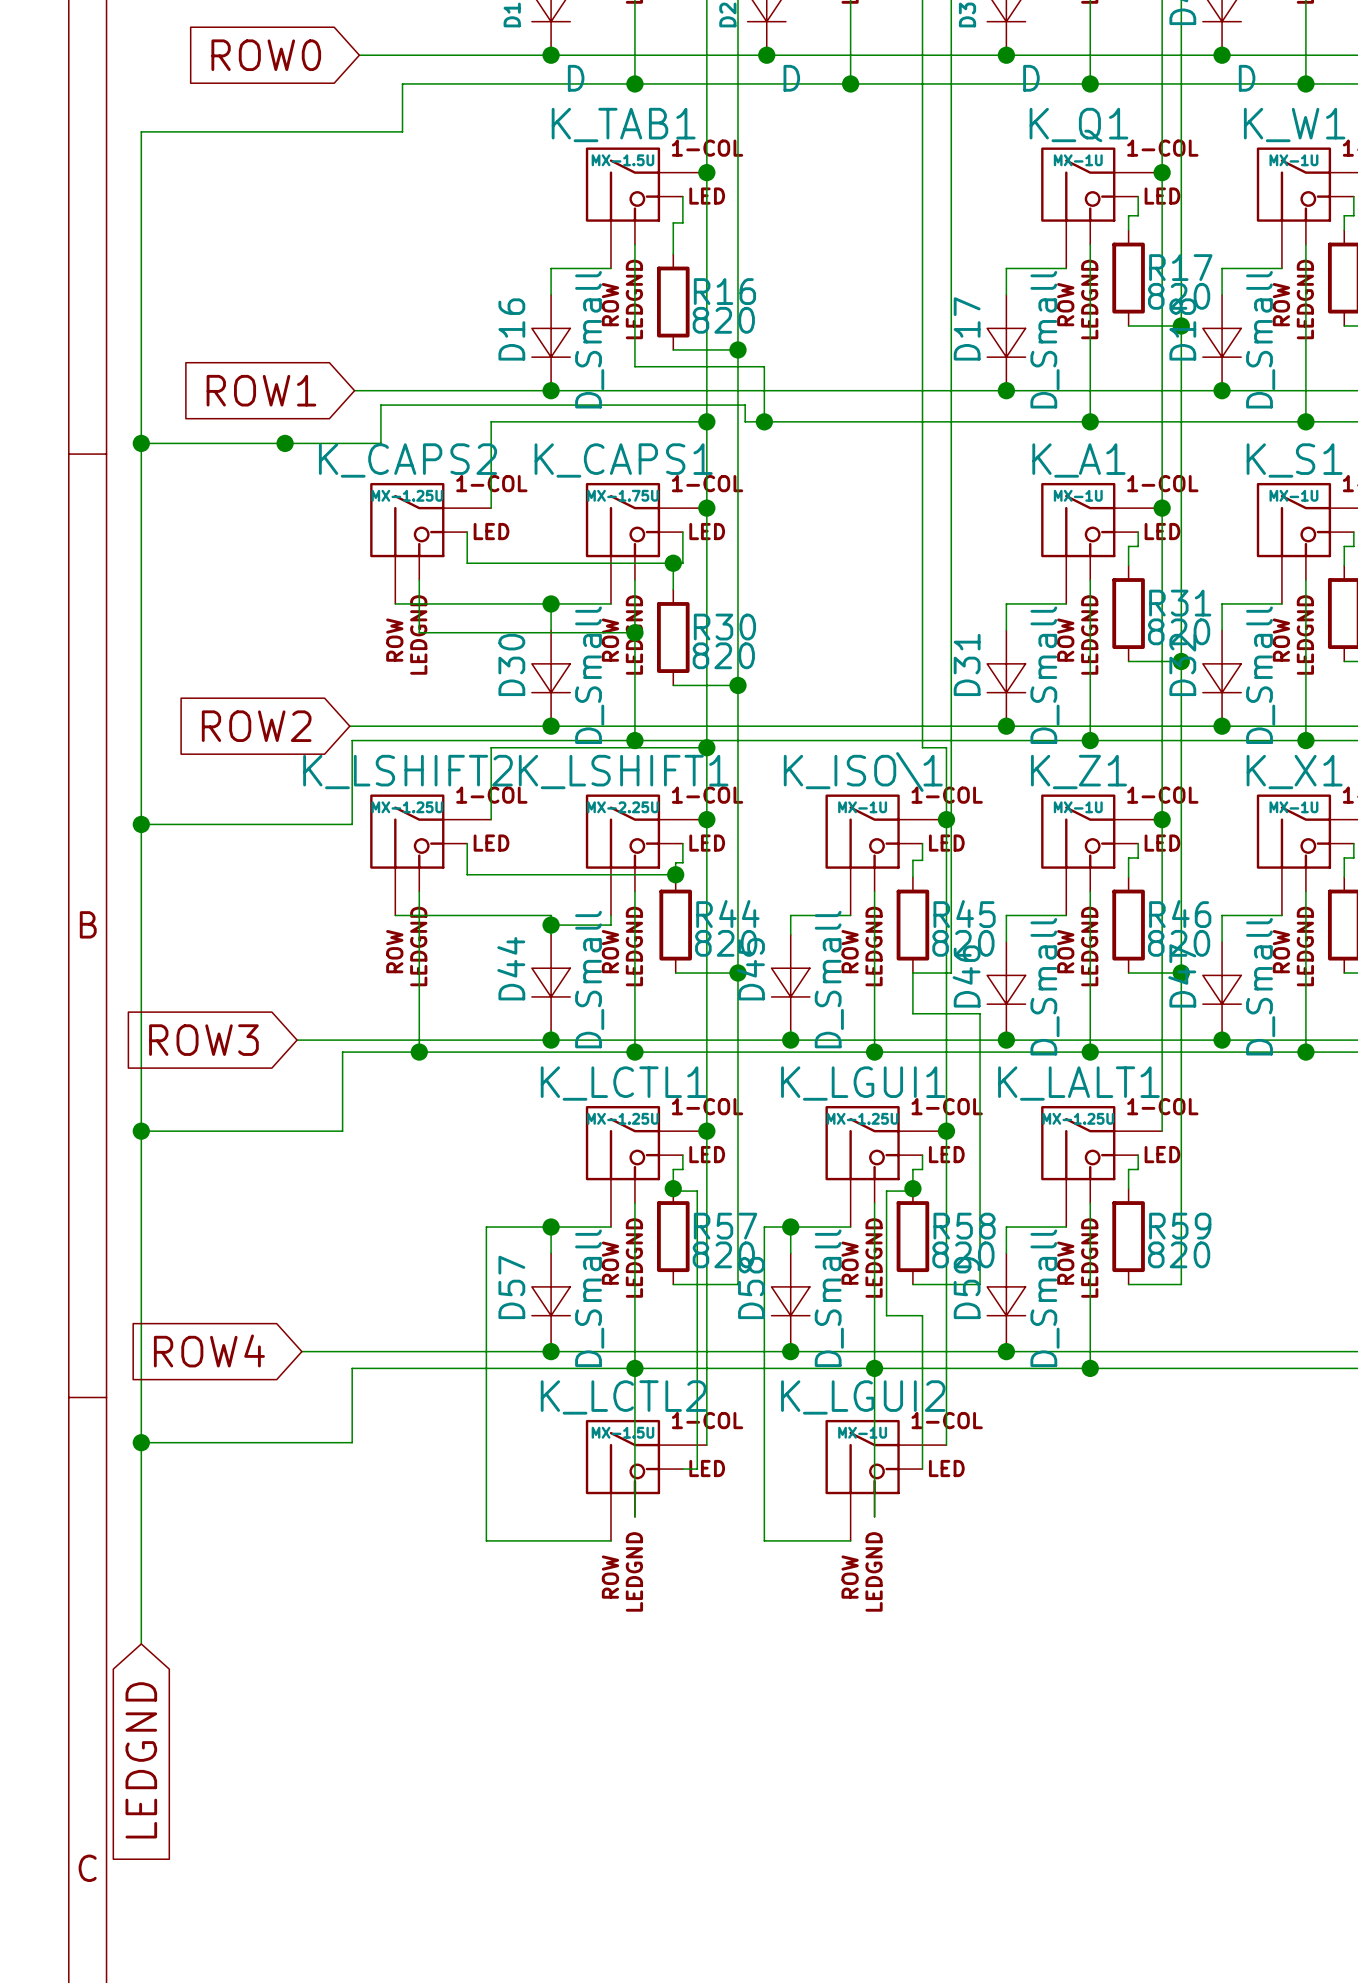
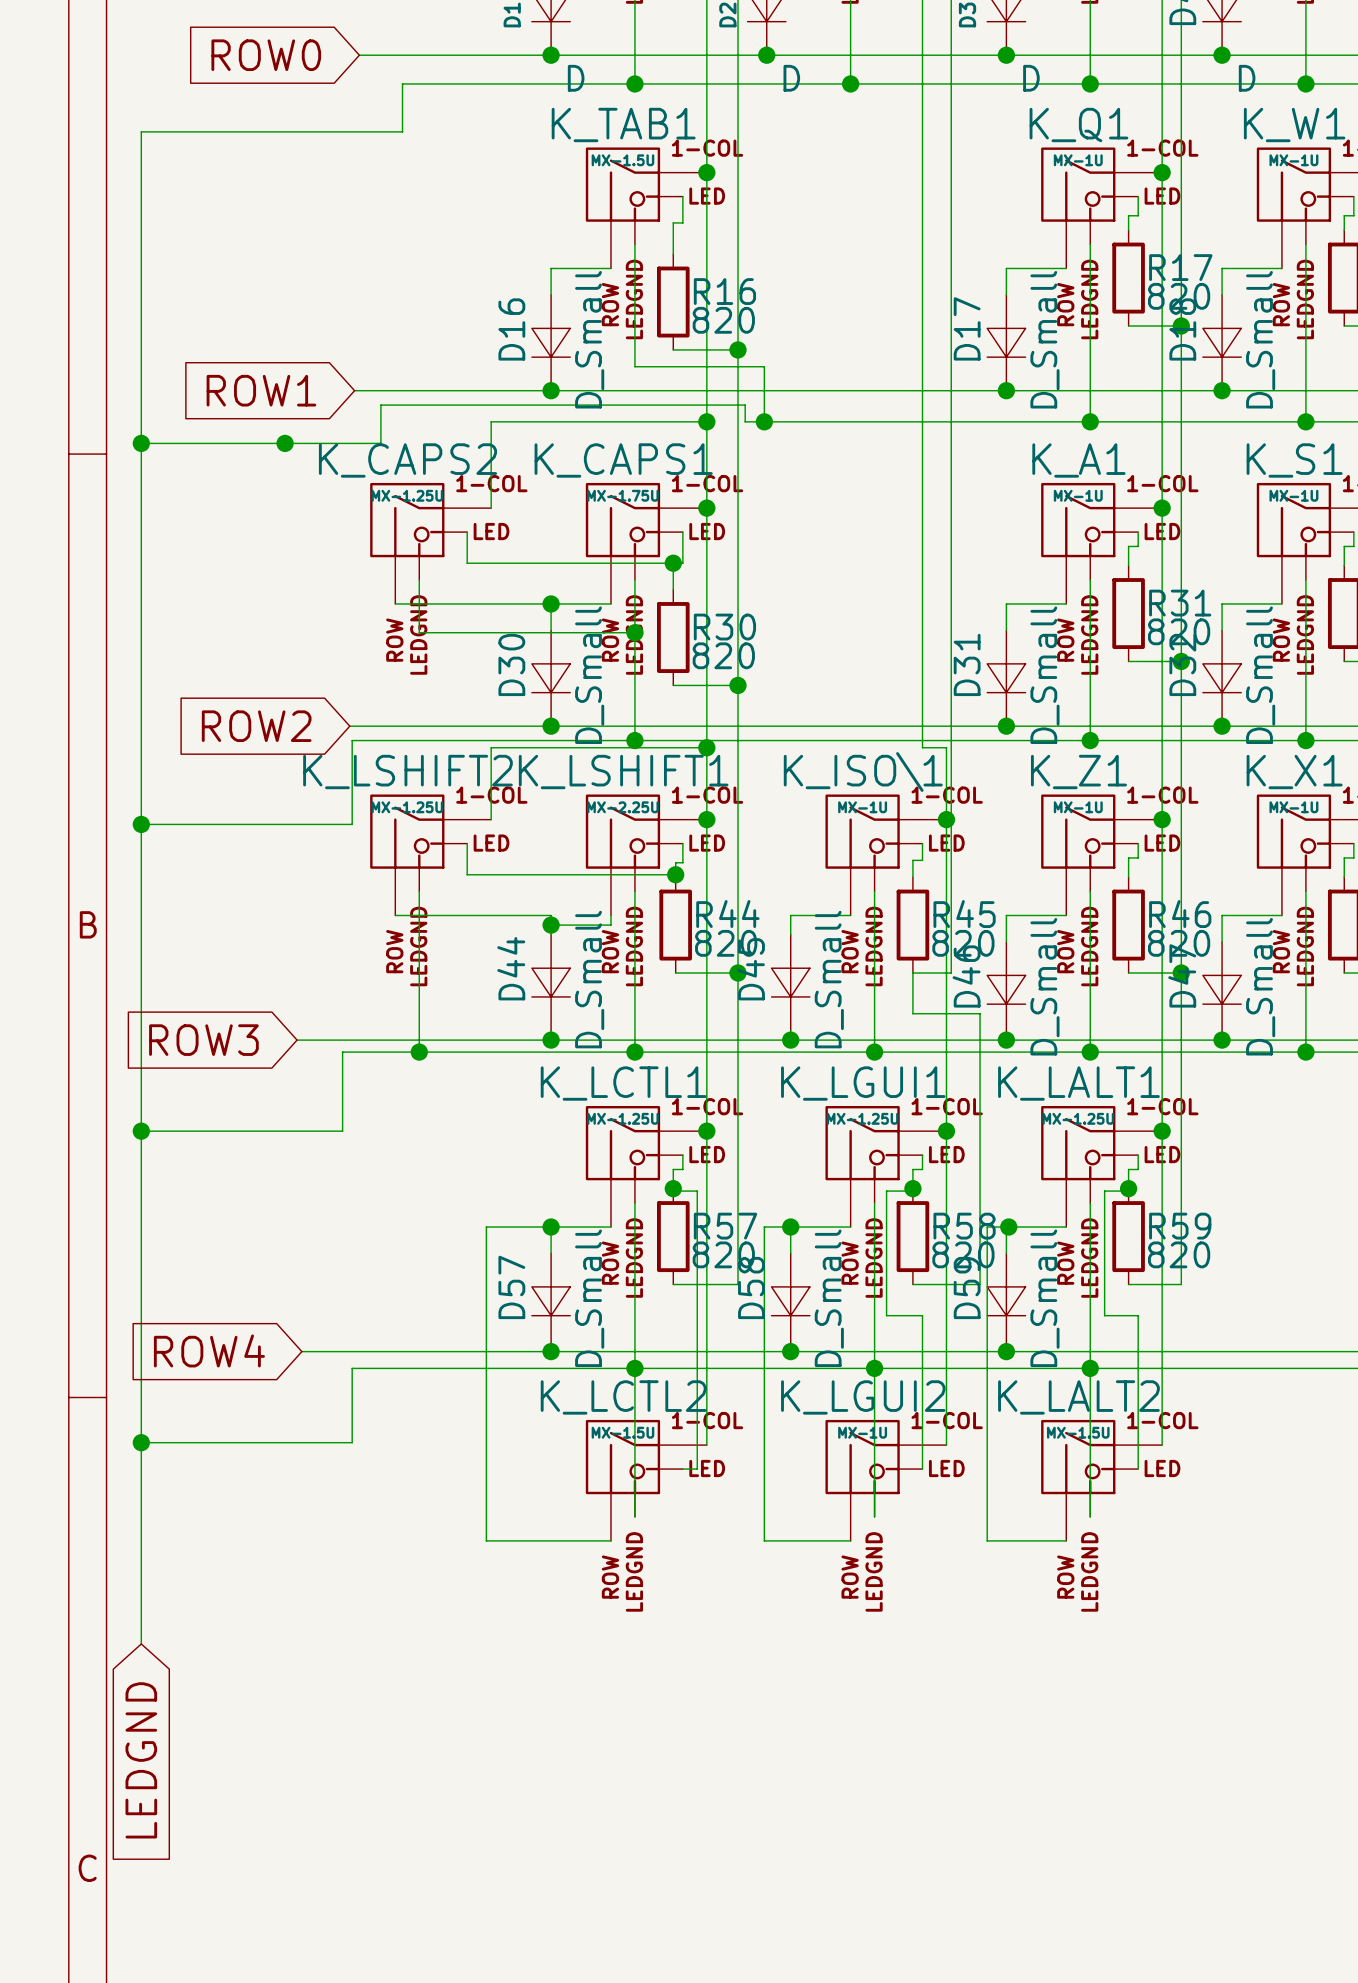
wire: none -> (1162, 1131) (1162, 1445)
junction: none -> (1162, 1131)
wire: none -> (1128, 1188) (1128, 1191) (1104, 1191) (1104, 1315) (1138, 1315) (1138, 1469)
junction: none -> (1128, 1188)
wire: none -> (1006, 1227) (987, 1227) (987, 1540) (1066, 1540)
junction: none -> (1008, 1227)
wire: none -> (1090, 1368) (1090, 1516)
K_LALT2: none -> MX-1.5U (1101, 1480)

